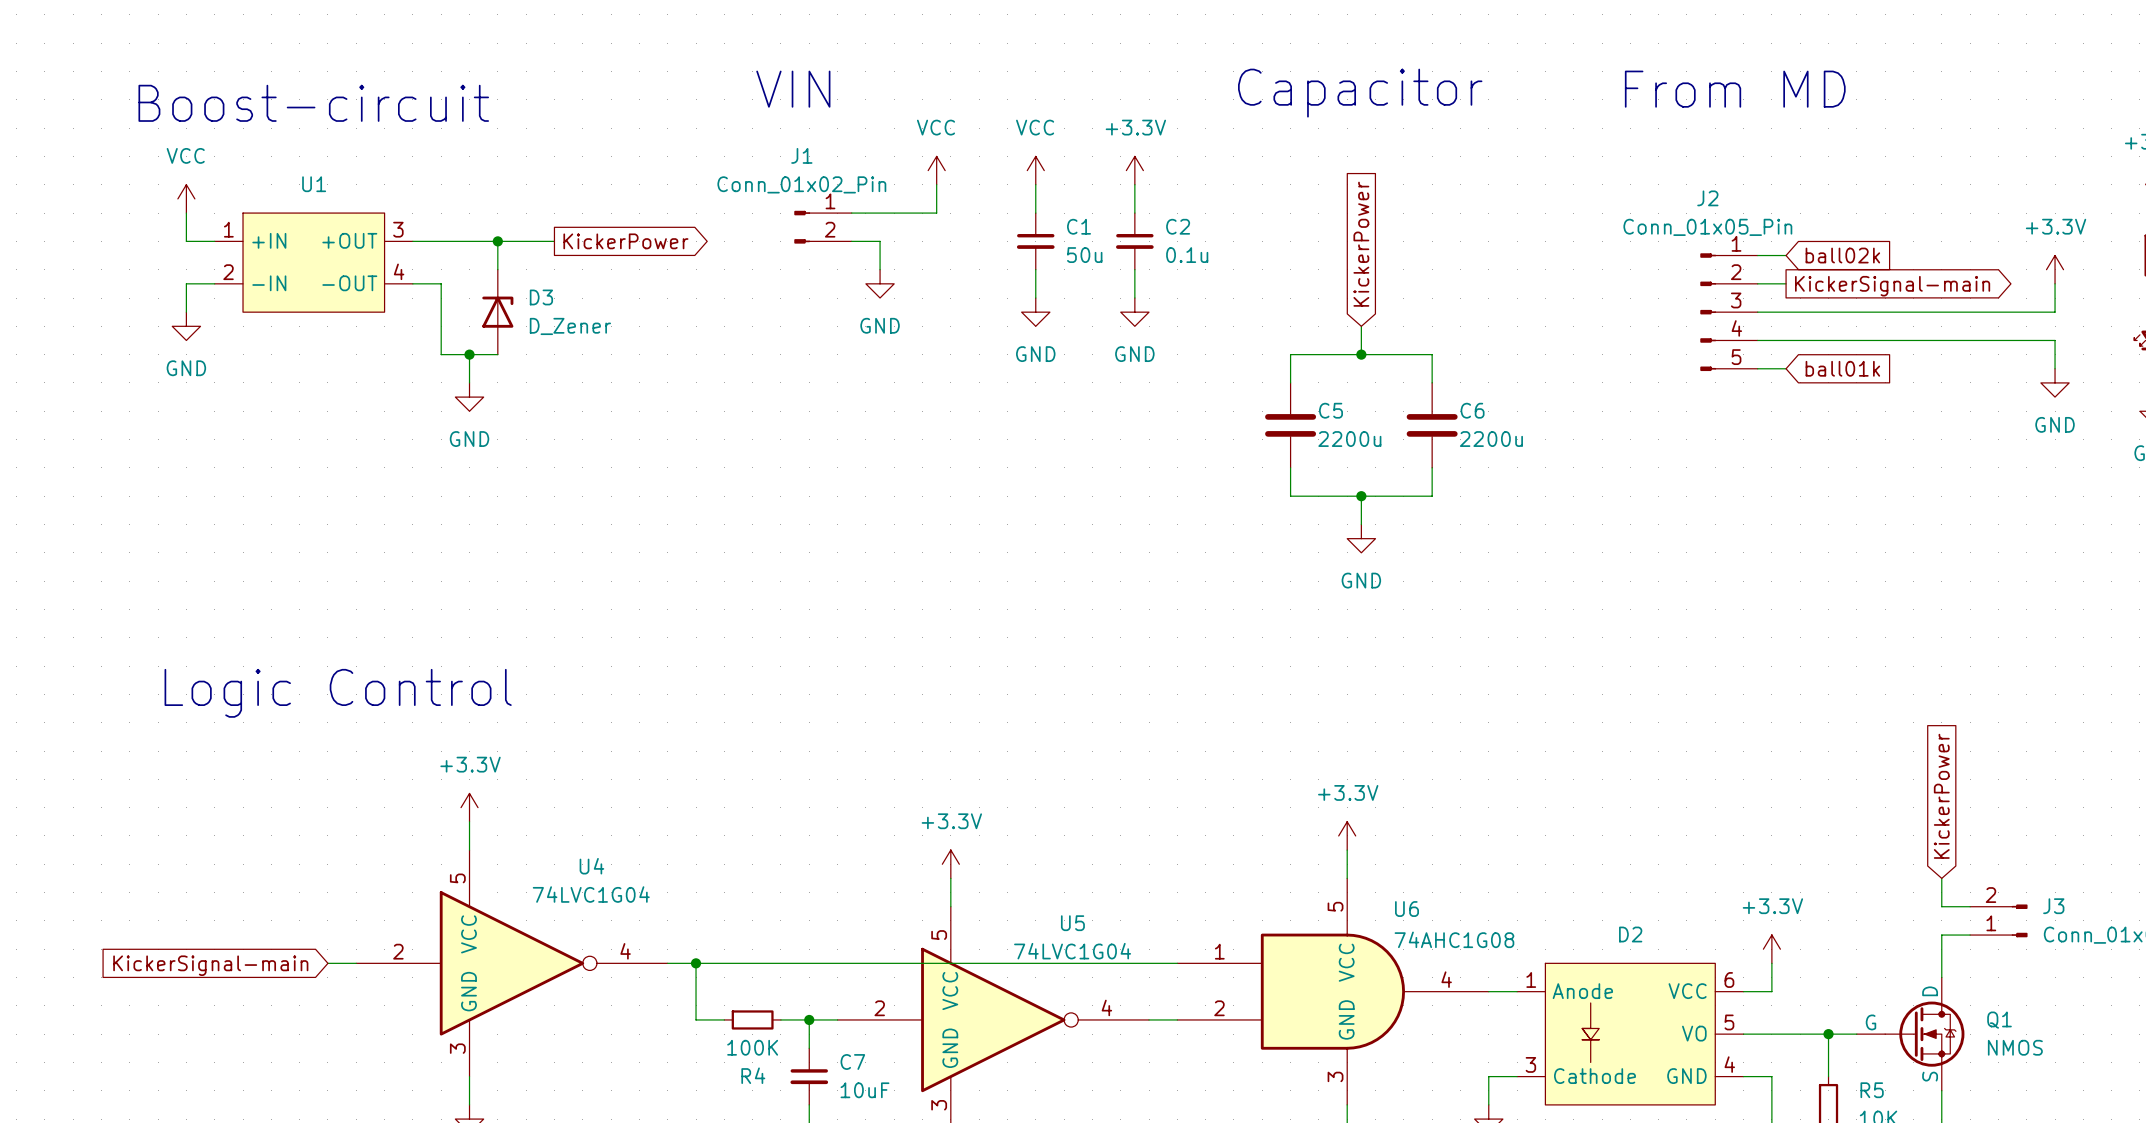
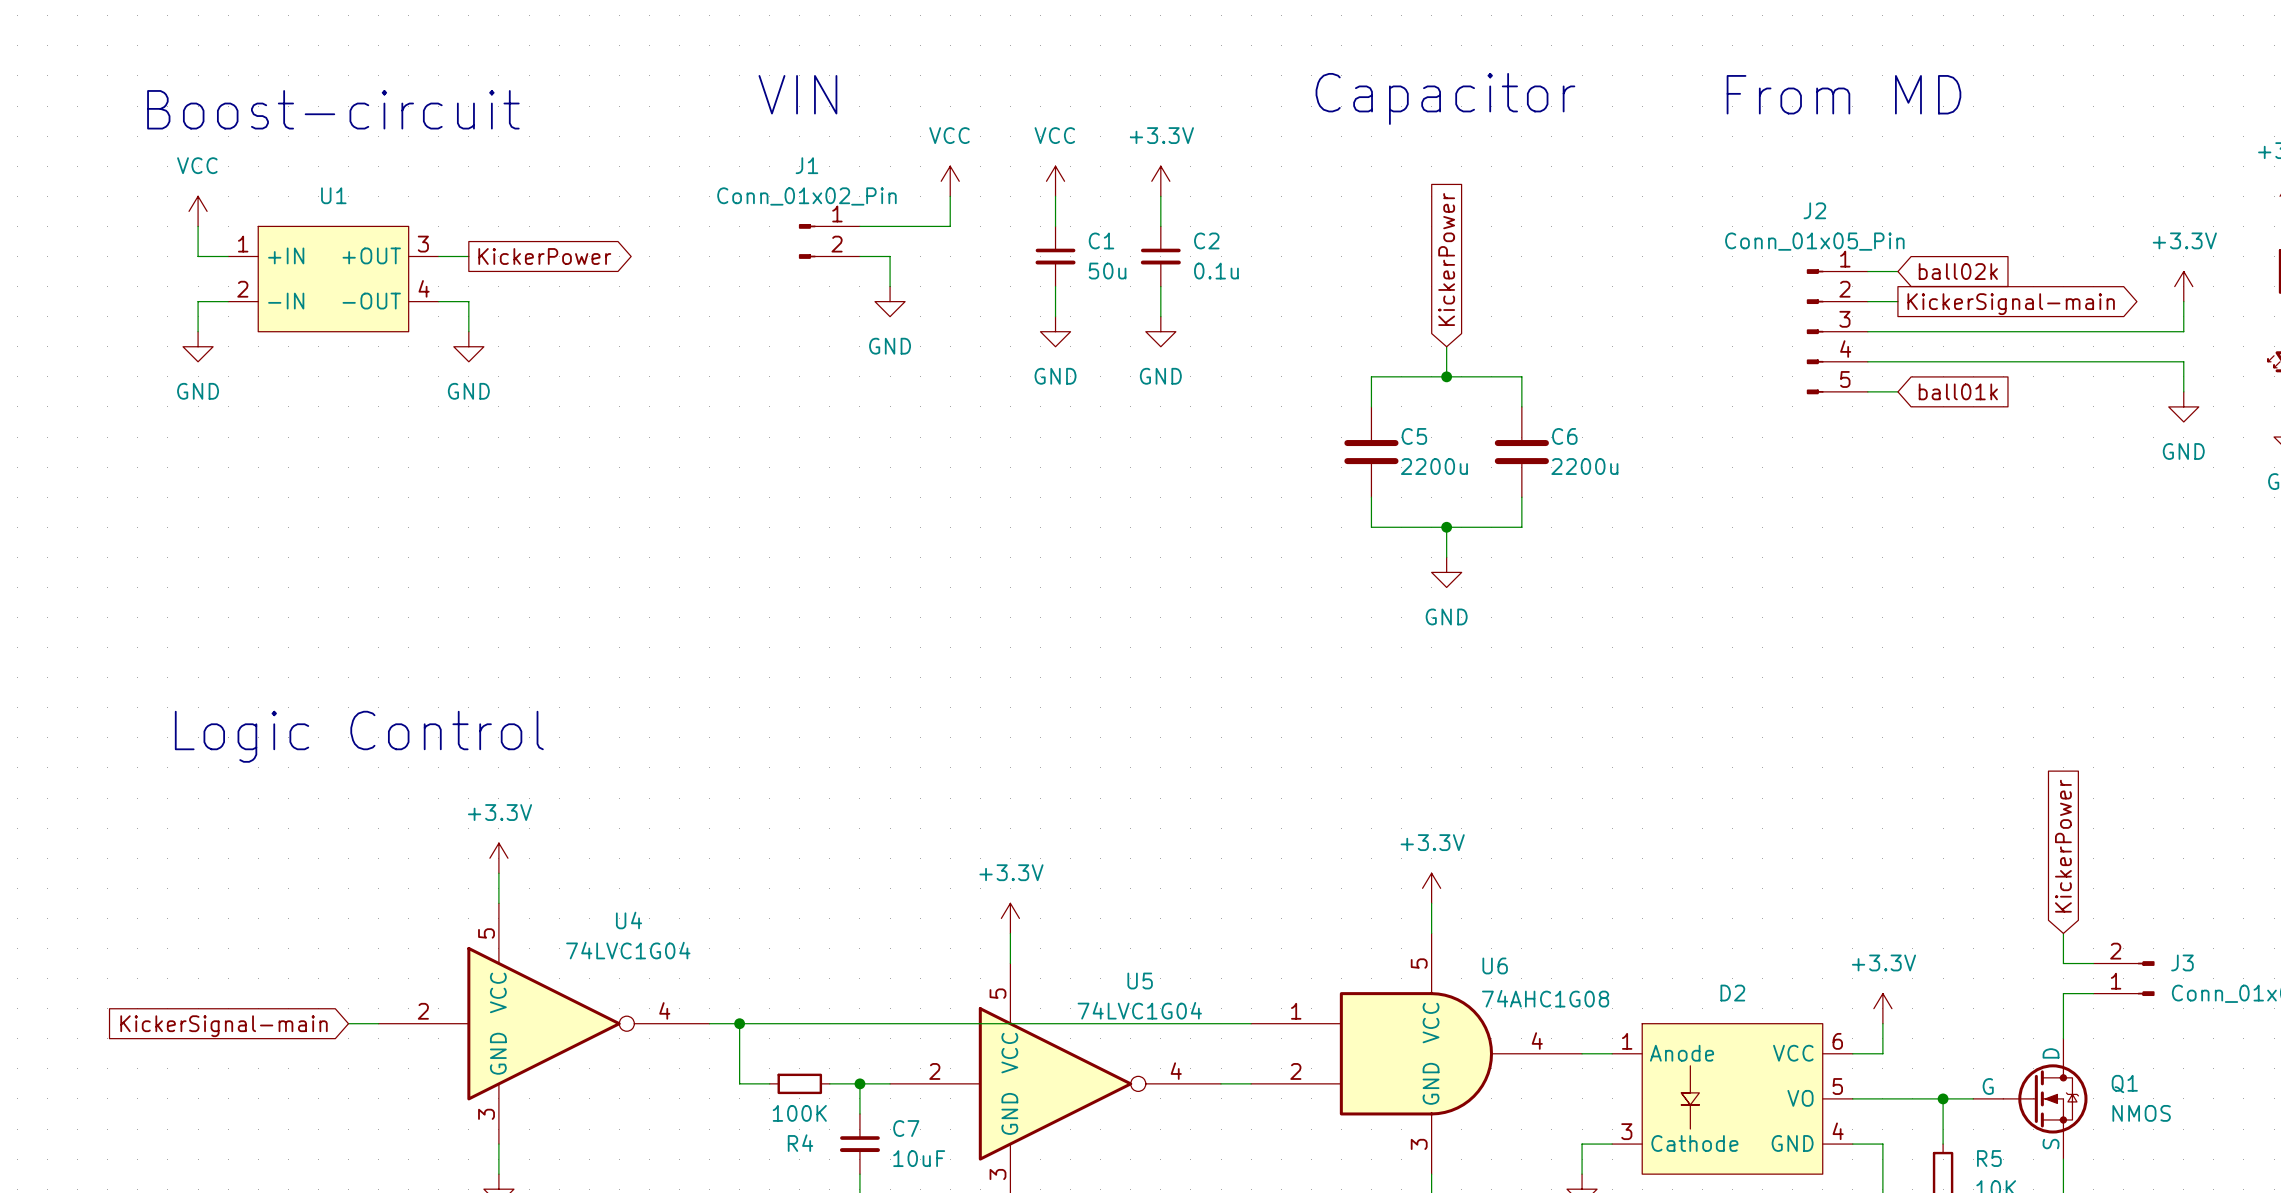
text position: VIN (793, 89) -> VIN (797, 94)
power symbol: none -> VCC (950, 181)
power symbol: VCC (936, 170) -> none
power symbol: none -> VCC (1055, 181)
power symbol: VCC (1035, 170) -> none
power symbol position: +3.3V (1134, 170) -> +3.3V (1160, 181)
wire: (936, 184) (936, 213) (894, 213) -> (950, 196) (950, 226)
wire: (1035, 184) (1035, 213) -> (1055, 196) (1055, 226)
wire: (1134, 184) (1134, 213) -> (1160, 196) (1160, 226)
J1 position: (823, 227) -> (829, 241)
wire: (441, 241) (554, 241) -> none
wire: (497, 241) (497, 269) -> none
junction: (497, 241) -> none
global label position: KickerPower (625, 241) -> KickerPower (544, 256)
wire: (851, 241) (880, 241) (880, 269) -> (859, 256) (890, 256) (890, 286)
C1 position: (1035, 241) -> (1055, 256)
C2 position: (1134, 241) -> (1160, 256)
wire: (1035, 269) (1035, 298) -> (1055, 286) (1055, 316)
wire: (1134, 269) (1134, 298) -> (1160, 286) (1160, 316)
power symbol position: GND (880, 283) -> GND (890, 301)
wire: (441, 312) (441, 354) (497, 354) -> none
D3: D_Zener (497, 312) -> none
power symbol: none -> GND (1055, 331)
power symbol: GND (1035, 312) -> none
power symbol: none -> GND (1160, 331)
power symbol: GND (1134, 312) -> none
wire: (469, 354) (469, 382) -> none
junction: (469, 354) -> none
power symbol position: GND (469, 397) -> GND (468, 346)

